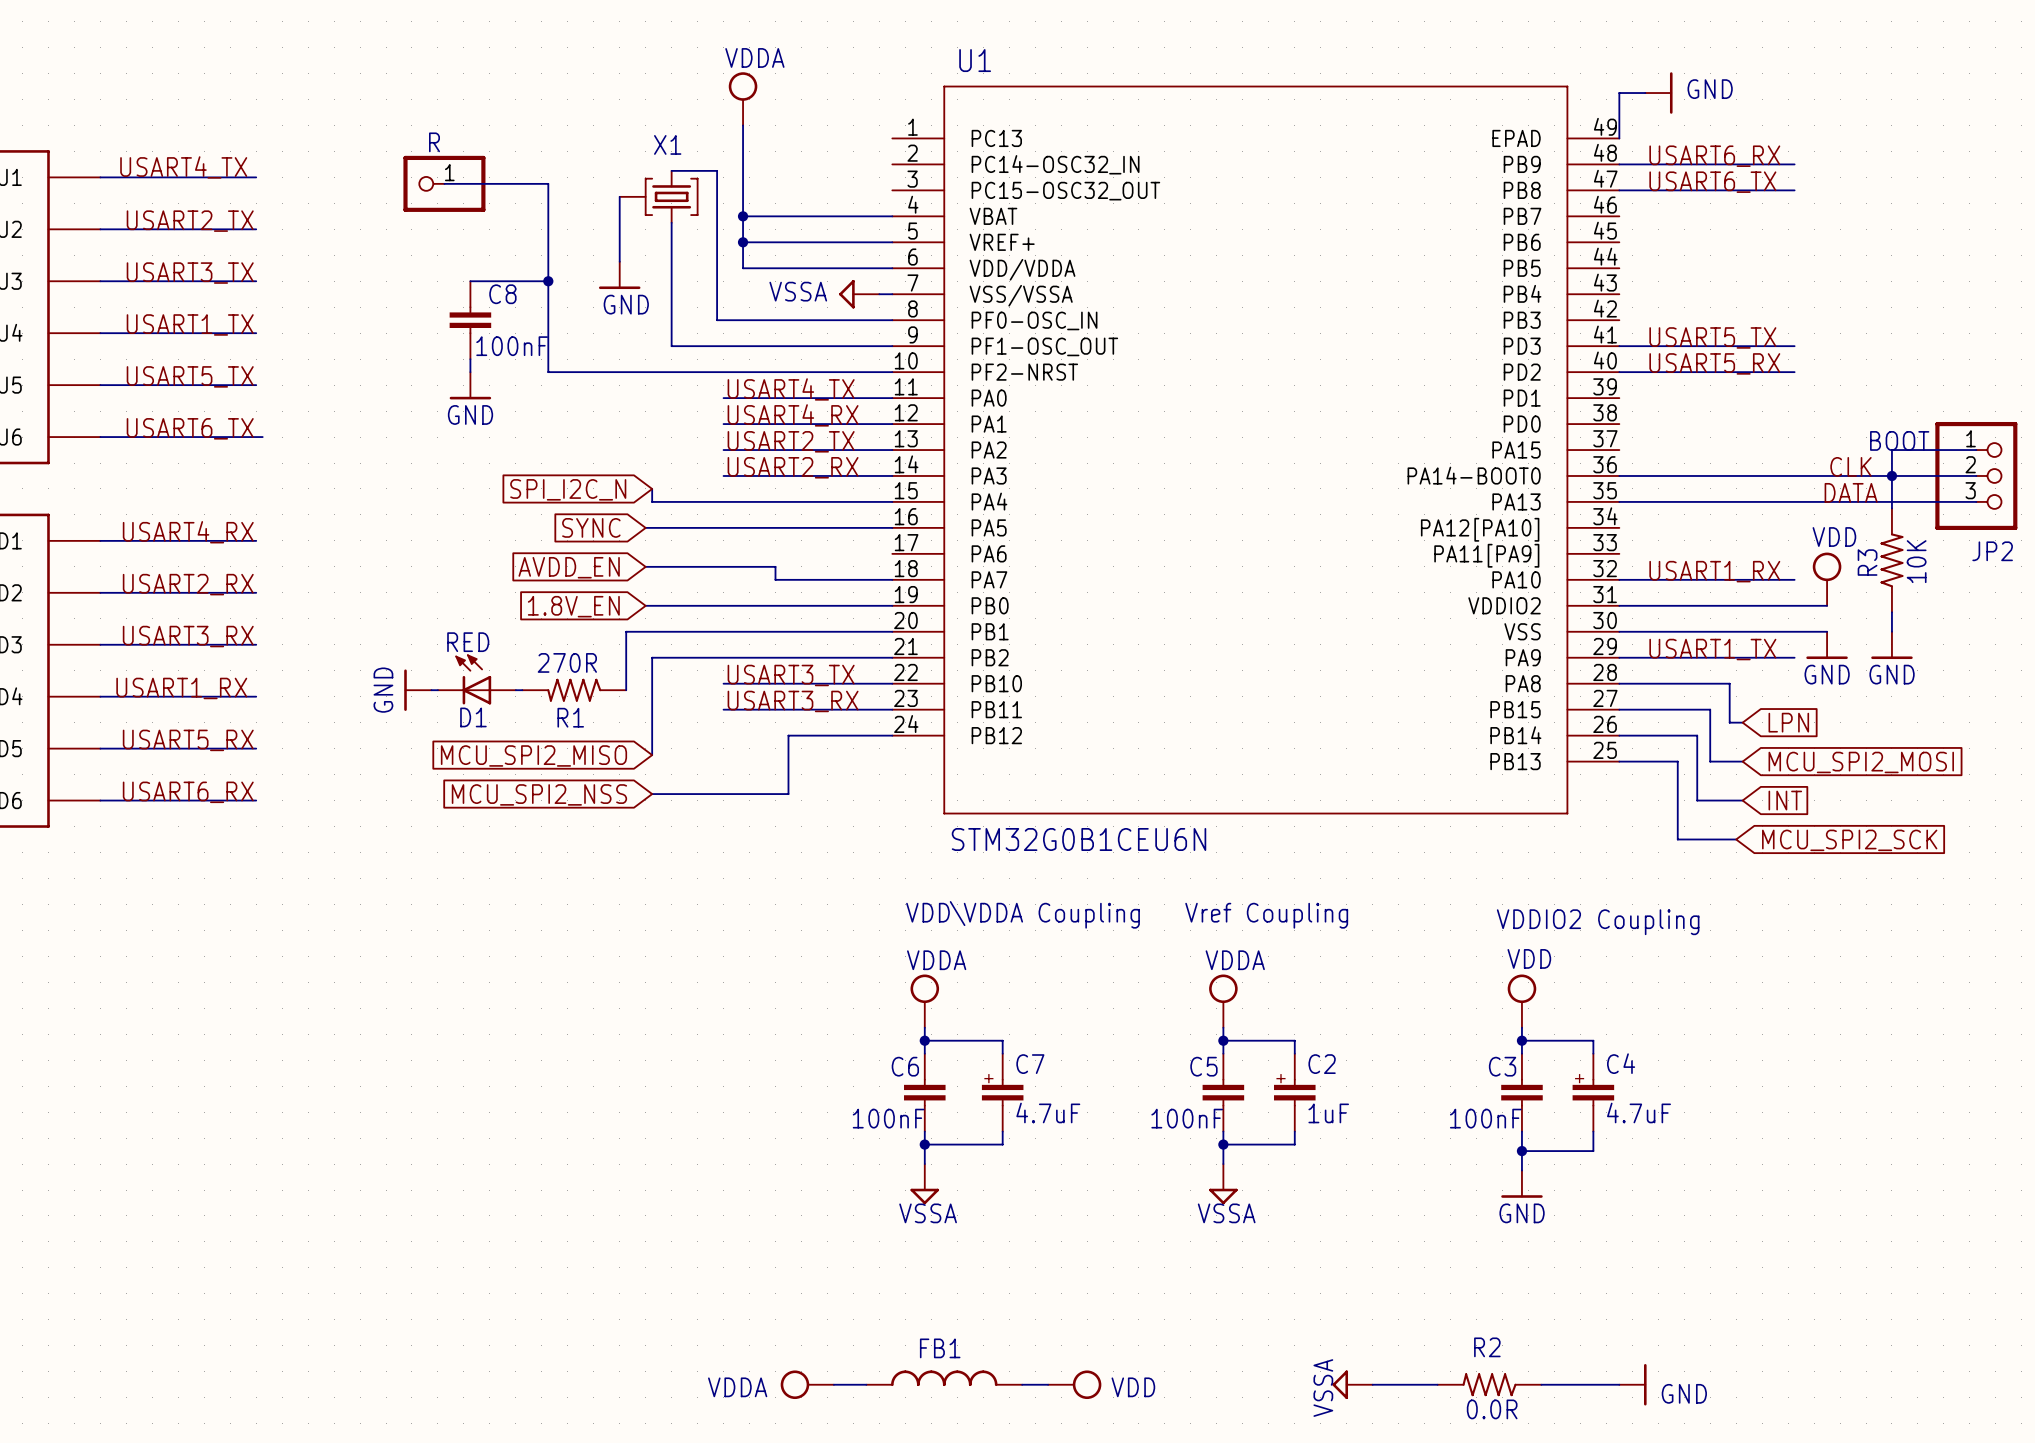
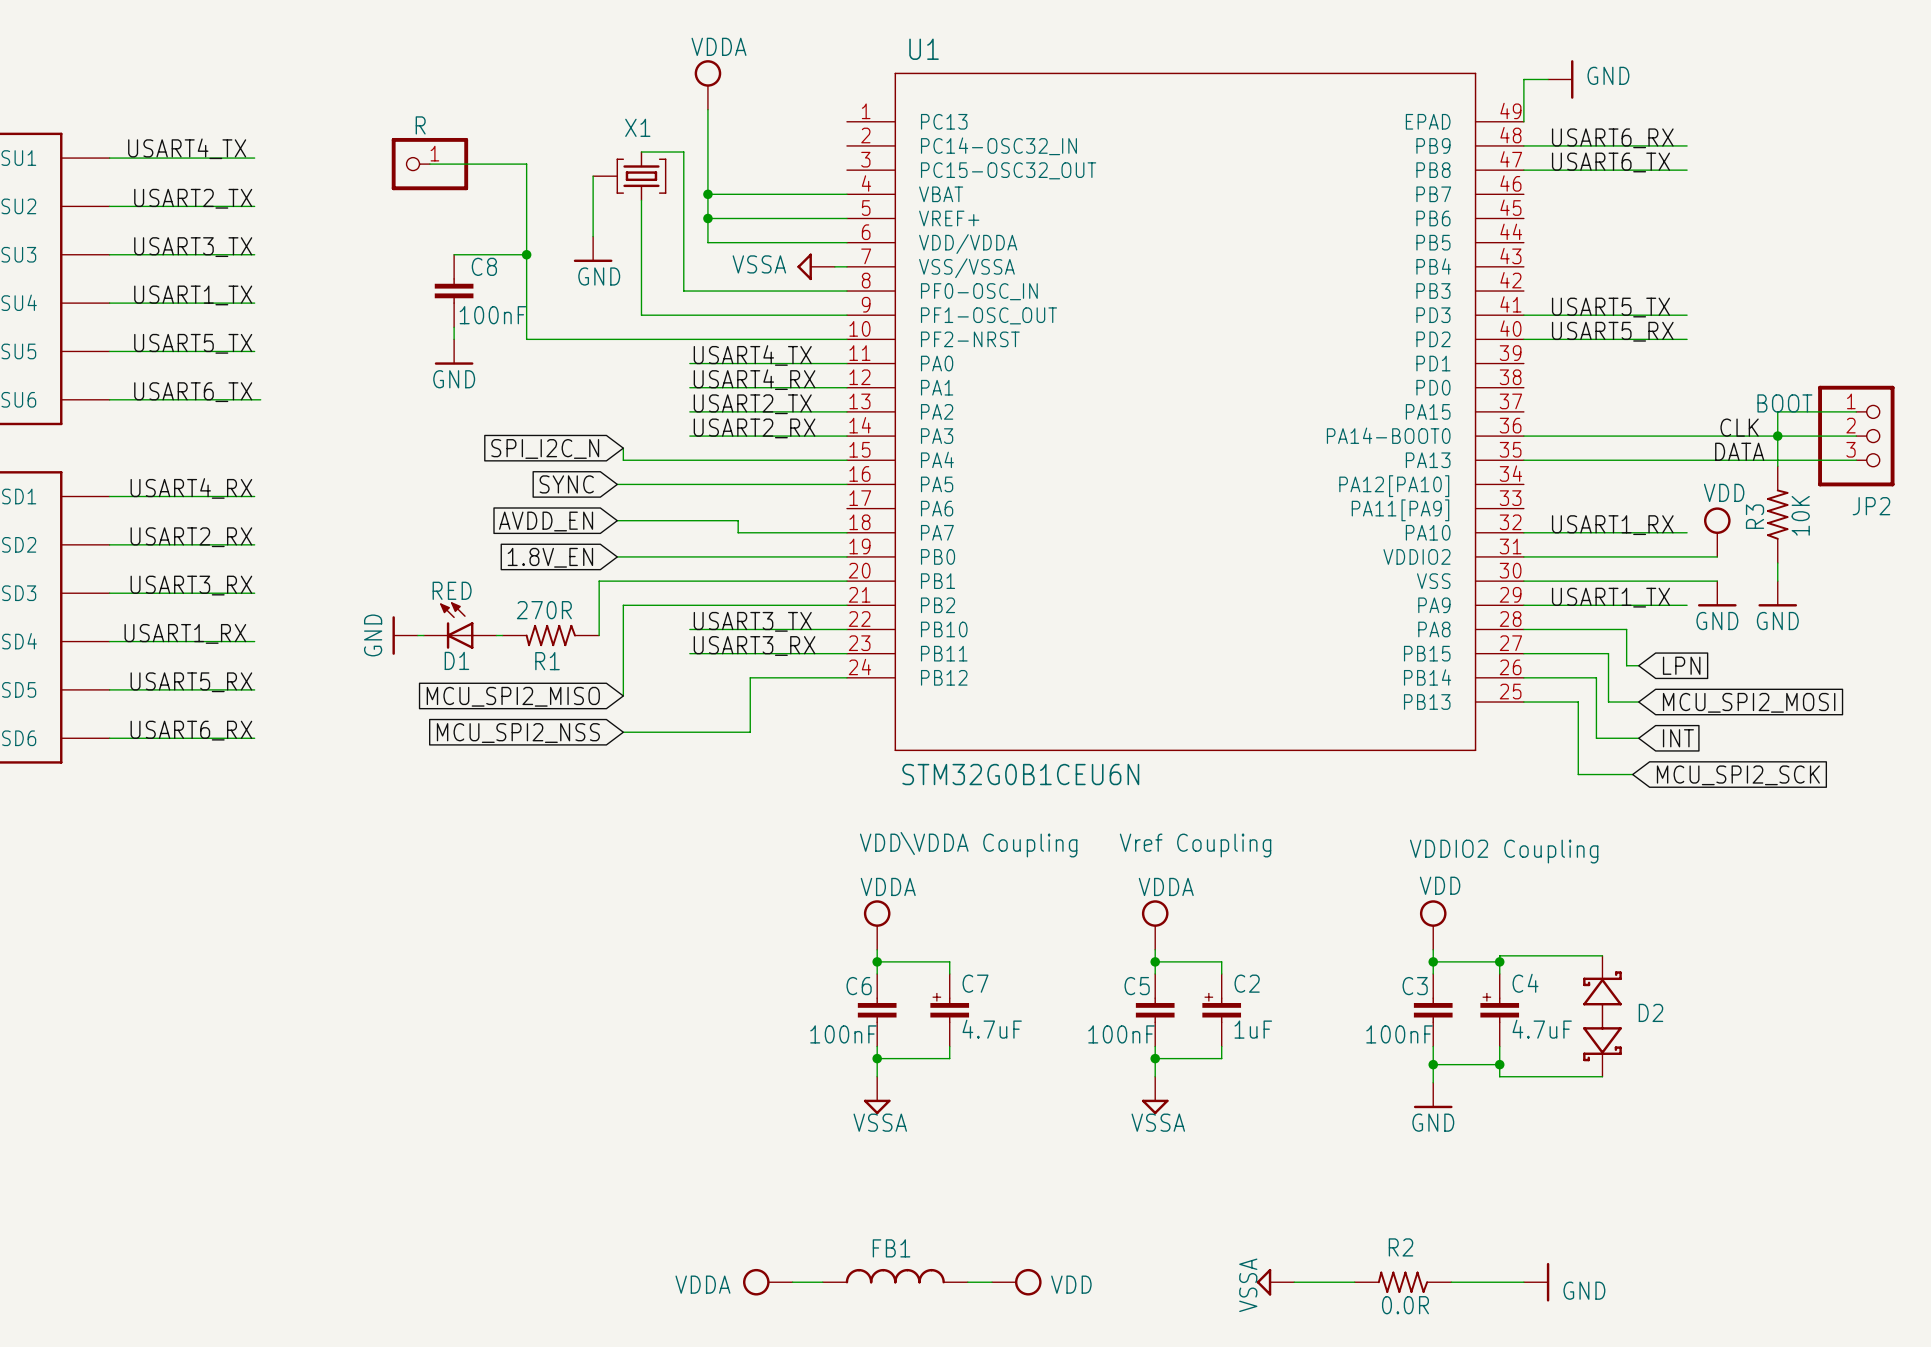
wire: none -> (1602, 955) (1499, 955) (1499, 961)
junction: none -> (1499, 961)
D2: none -> (1602, 1016)
wire: none -> (1499, 1064) (1499, 1076) (1602, 1076)
junction: none -> (1499, 1064)

